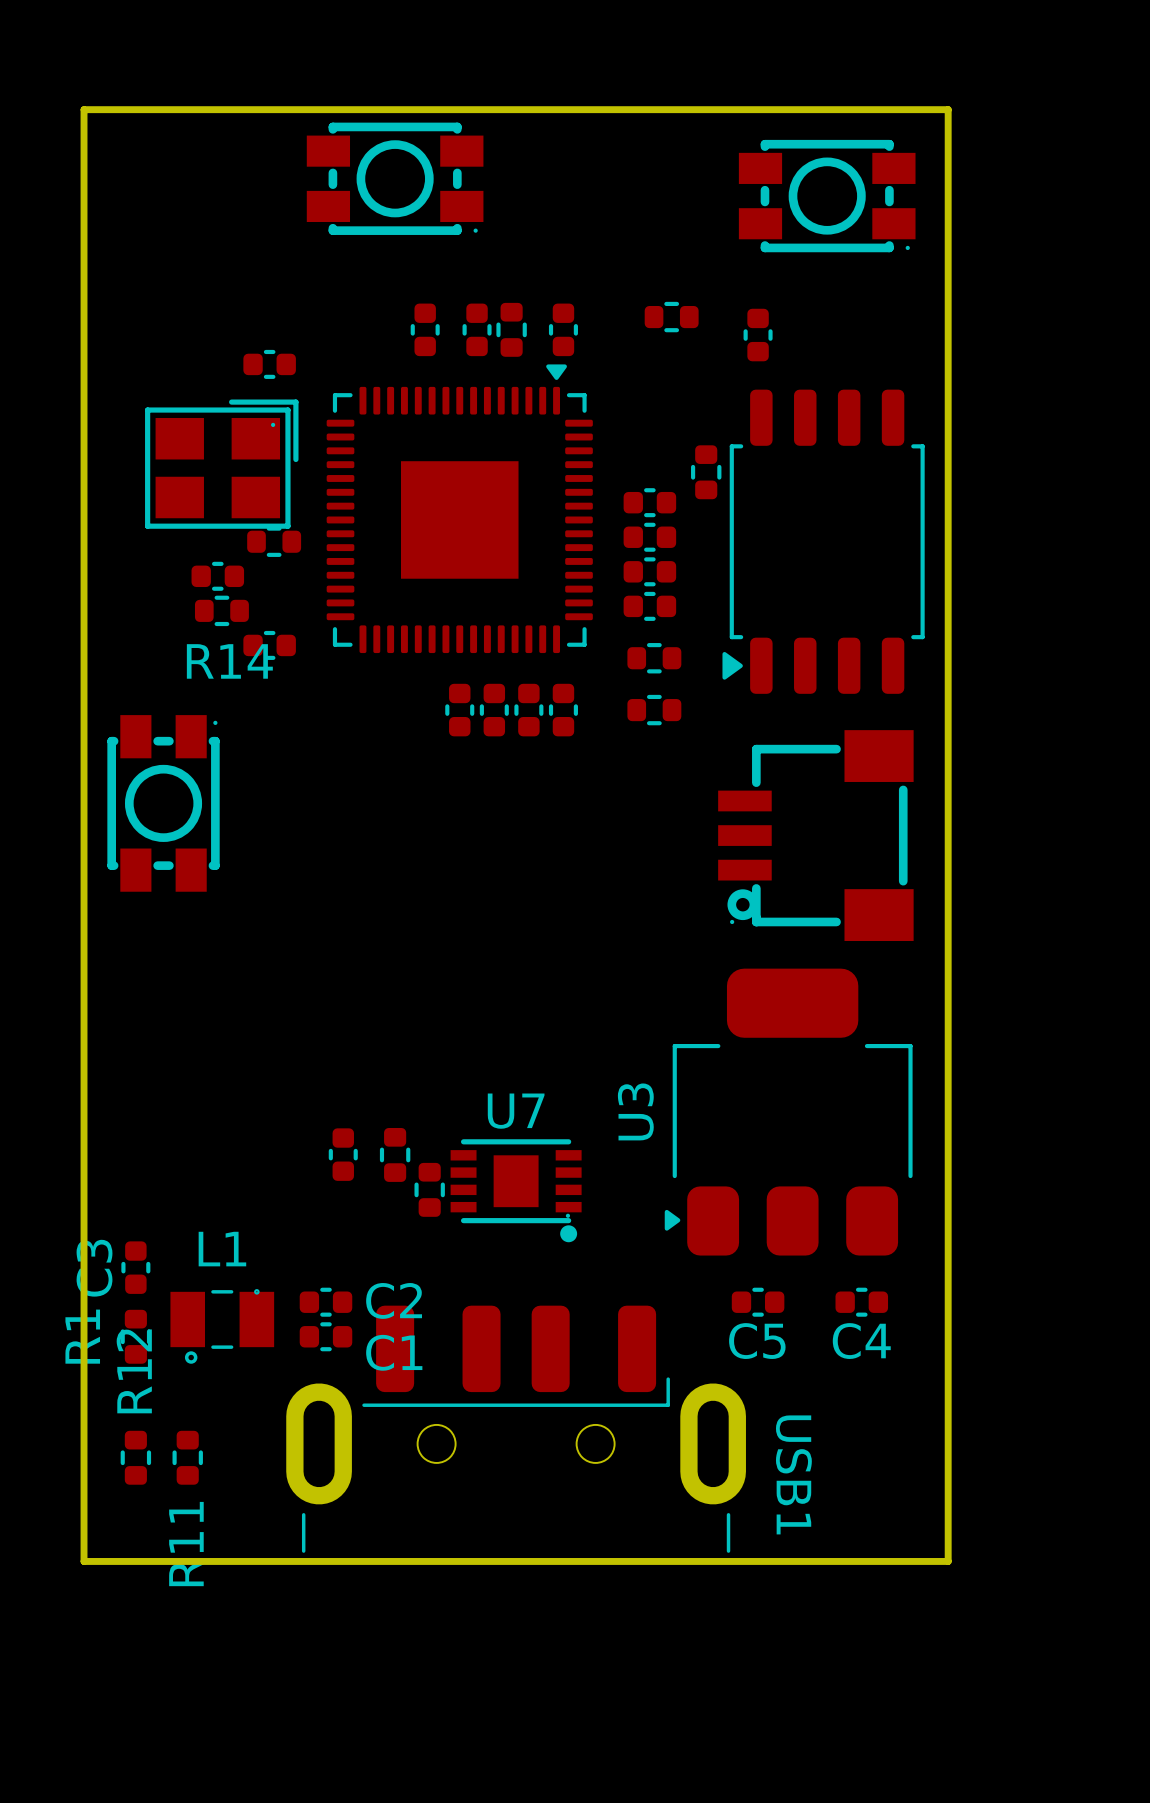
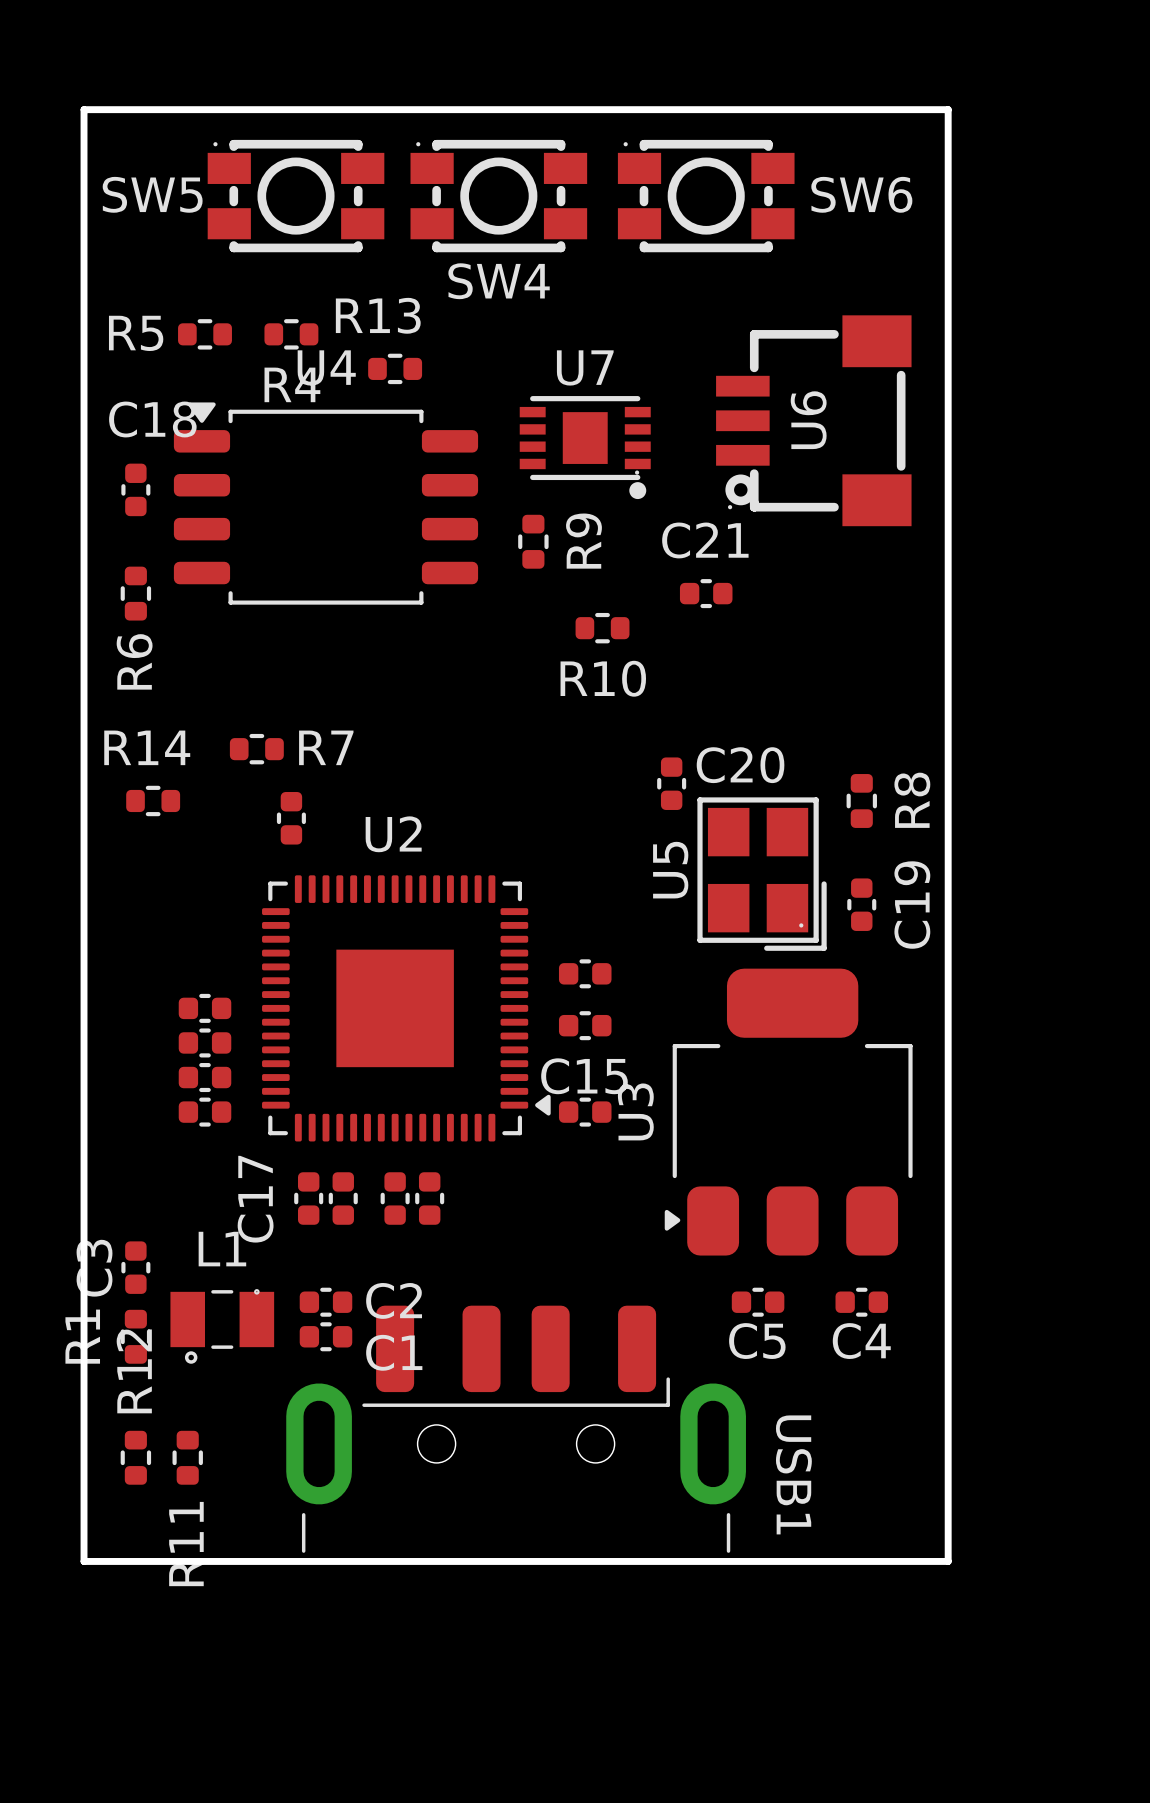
part: (395, 178) -> none
SW5: none -> (296, 196)
SW4: none -> (498, 196)
SW6: none -> (706, 196)
part: (827, 196) -> none
part: (671, 317) -> none
part: (425, 329) -> none
part: (477, 329) -> none
part: (511, 329) -> none
part: (563, 329) -> none
R5: none -> (205, 334)
R4: none -> (291, 334)
part: (758, 335) -> none
part: (269, 364) -> none
R13: none -> (395, 368)
U6: none -> (813, 420)
part: (221, 464) -> none
part: (706, 472) -> none
C18: none -> (135, 489)
part: (649, 502) -> none
U4: none -> (325, 503)
part: (459, 508) -> none
part: (649, 537) -> none
part: (274, 541) -> none
R9: none -> (533, 541)
part: (823, 541) -> none
part: (649, 571) -> none
part: (217, 576) -> none
R6: none -> (135, 593)
C21: none -> (706, 593)
part: (649, 606) -> none
R14 position: (221, 610) -> (153, 800)
R10: none -> (602, 628)
part: (269, 645) -> none
part: (654, 658) -> none
R14 name position: R14 (229, 661) -> R14 (147, 747)
part: (459, 710) -> none
part: (494, 710) -> none
part: (528, 710) -> none
part: (563, 710) -> none
part: (654, 710) -> none
R7: none -> (256, 749)
C20: none -> (671, 783)
R8: none -> (861, 800)
part: (163, 803) -> none
part: none -> (291, 818)
part: (815, 835) -> none
U5: none -> (762, 874)
C19: none -> (861, 904)
part: none -> (585, 973)
part: none -> (205, 1008)
U2: none -> (406, 1008)
C15: none -> (585, 1025)
part: none -> (205, 1042)
part: none -> (205, 1077)
part: none -> (205, 1112)
part: none -> (585, 1112)
part: (343, 1154) -> none
part: (395, 1154) -> none
part footprint: [414, 1162, 445, 1217] -> [415, 1172, 445, 1225]
U7 position: (516, 1190) -> (585, 447)
C17: none -> (308, 1198)
part: none -> (343, 1198)
part: none -> (395, 1198)

